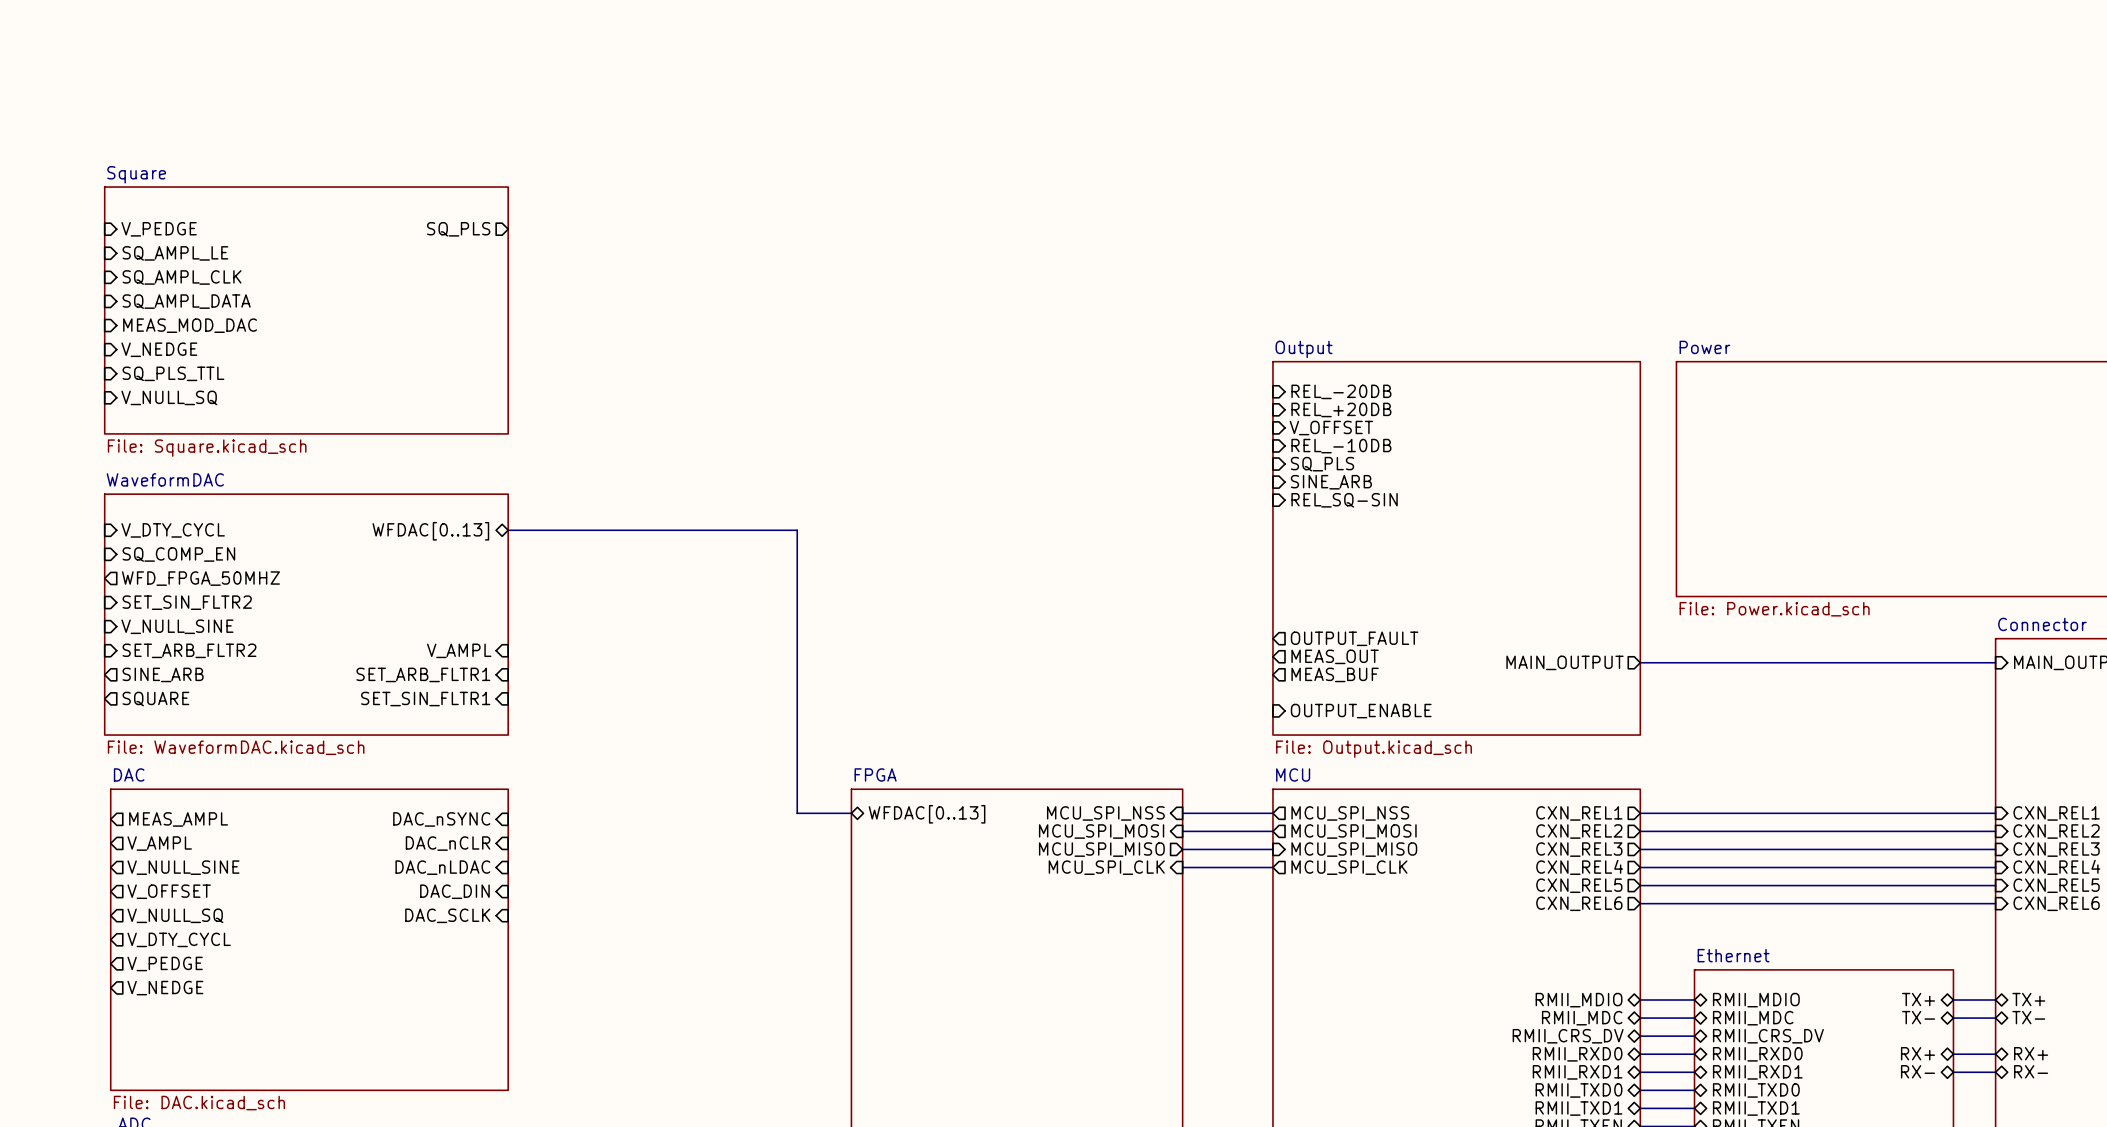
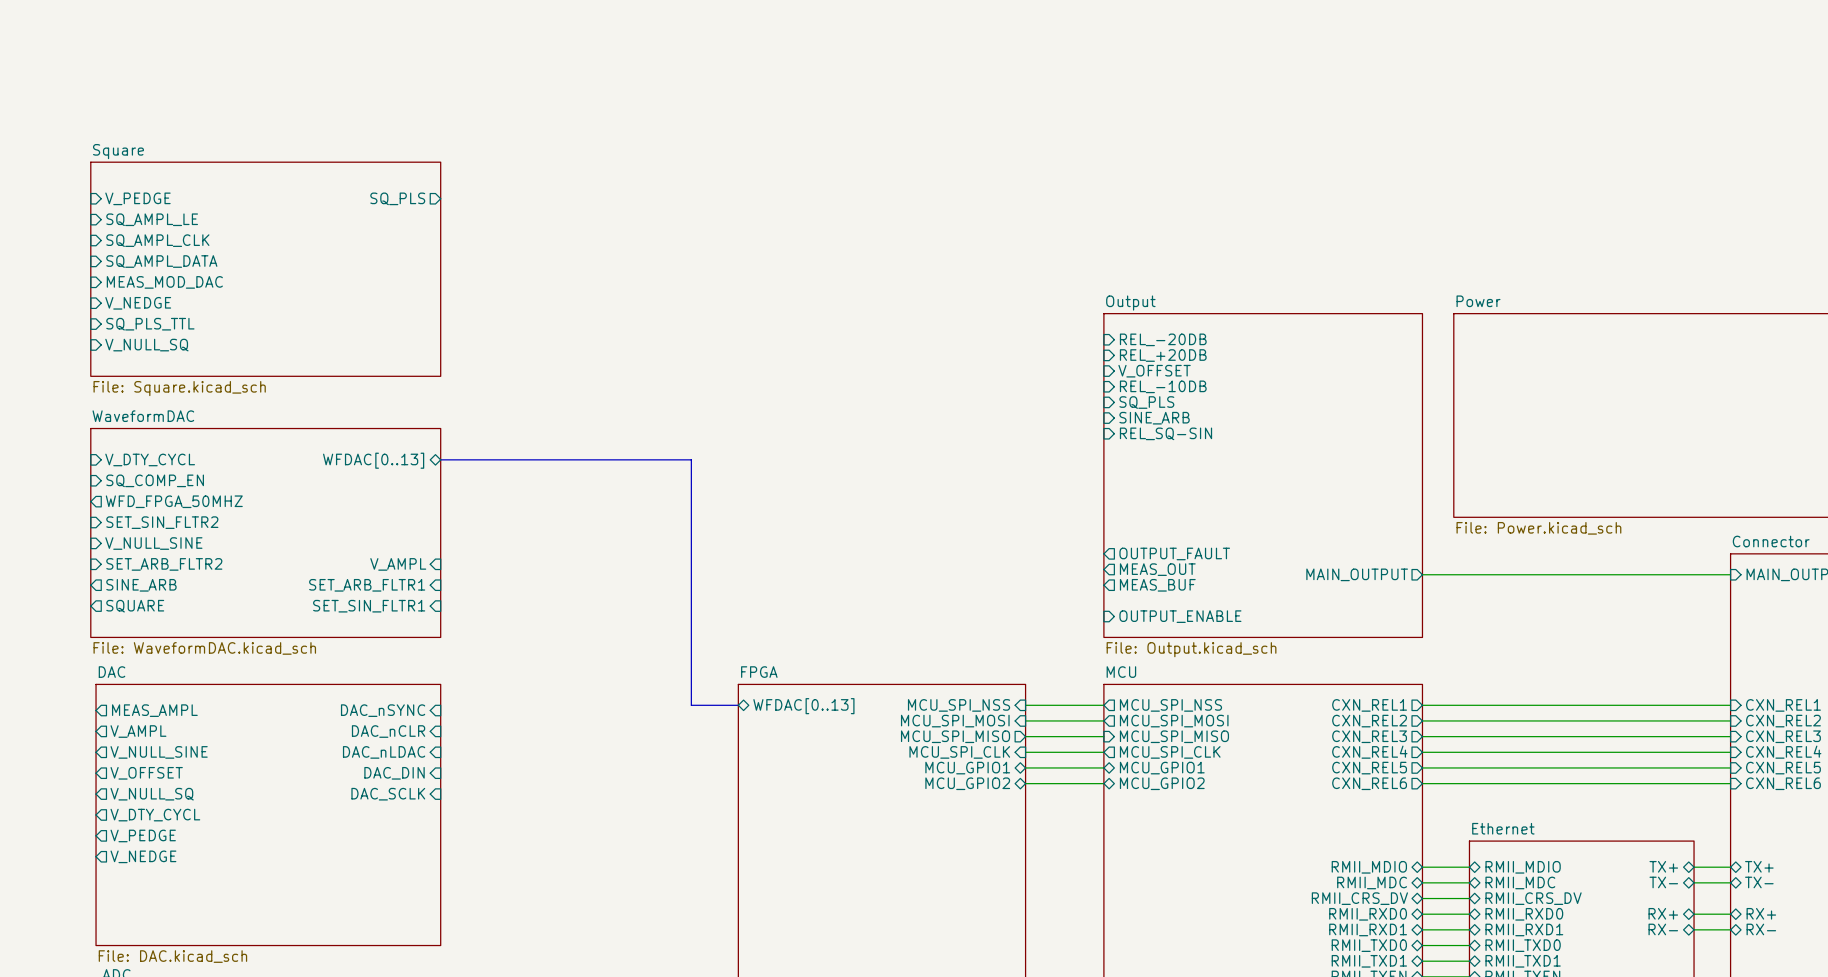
sheet pin: none -> MCU_GPIO1 (967, 768)
wire: none -> (1025, 767) (1103, 767)
sheet pin: none -> MCU_GPIO1 (1162, 768)
sheet pin: none -> MCU_GPIO2 (967, 783)
wire: none -> (1025, 783) (1103, 783)
sheet pin: none -> MCU_GPIO2 (1162, 783)

